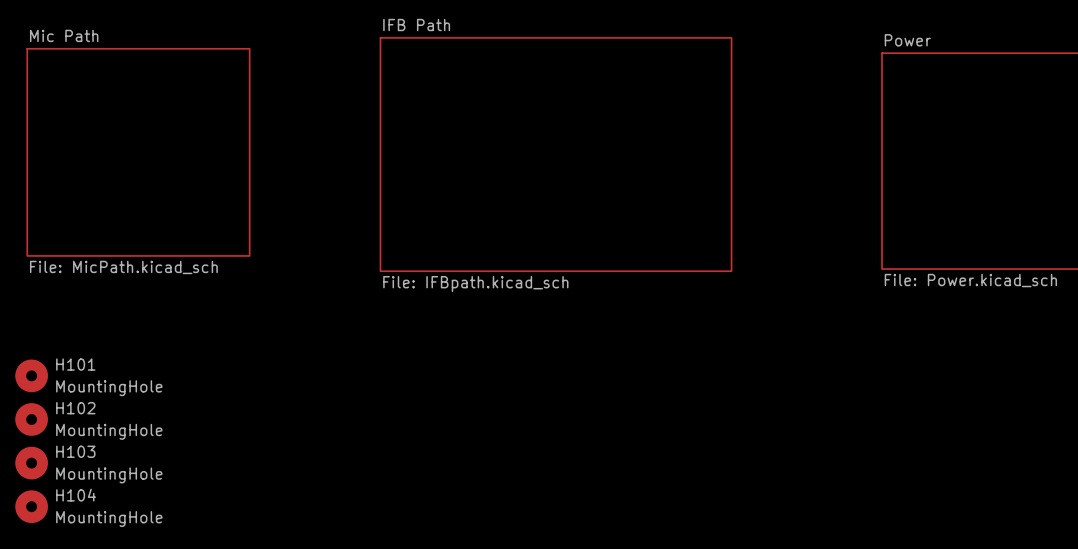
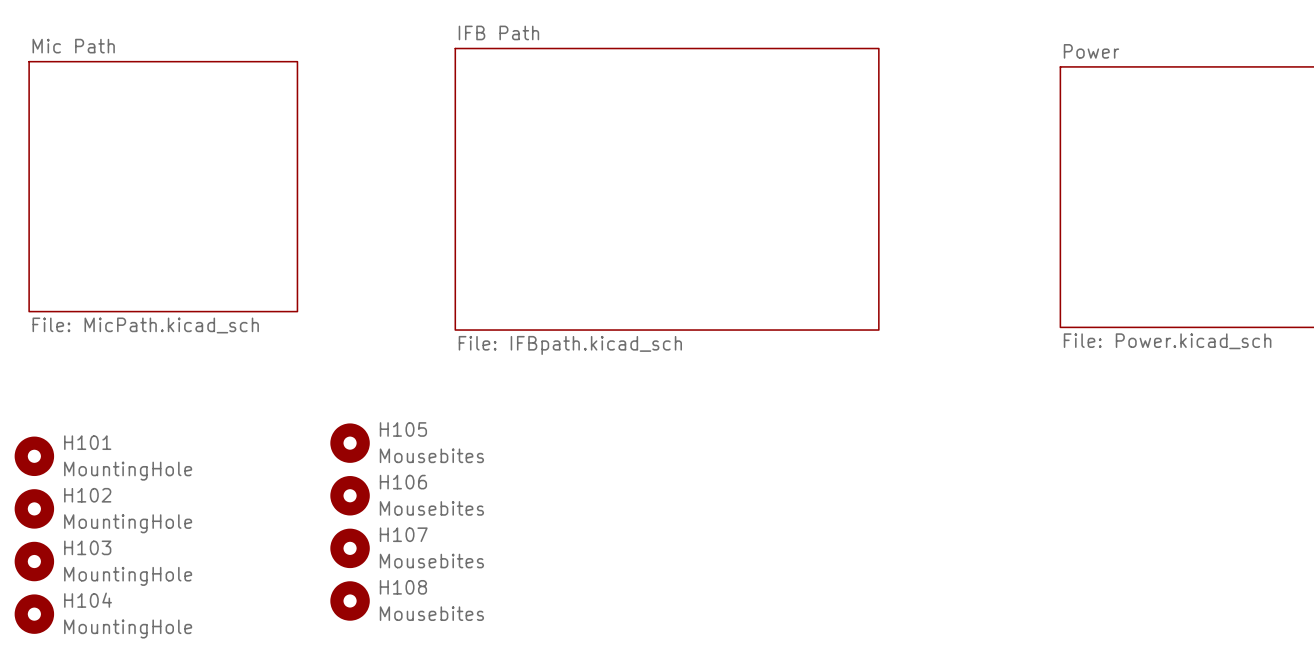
H105: none -> Mousebites (350, 443)
H106: none -> Mousebites (350, 495)
H107: none -> Mousebites (350, 548)
H108: none -> Mousebites (350, 600)

